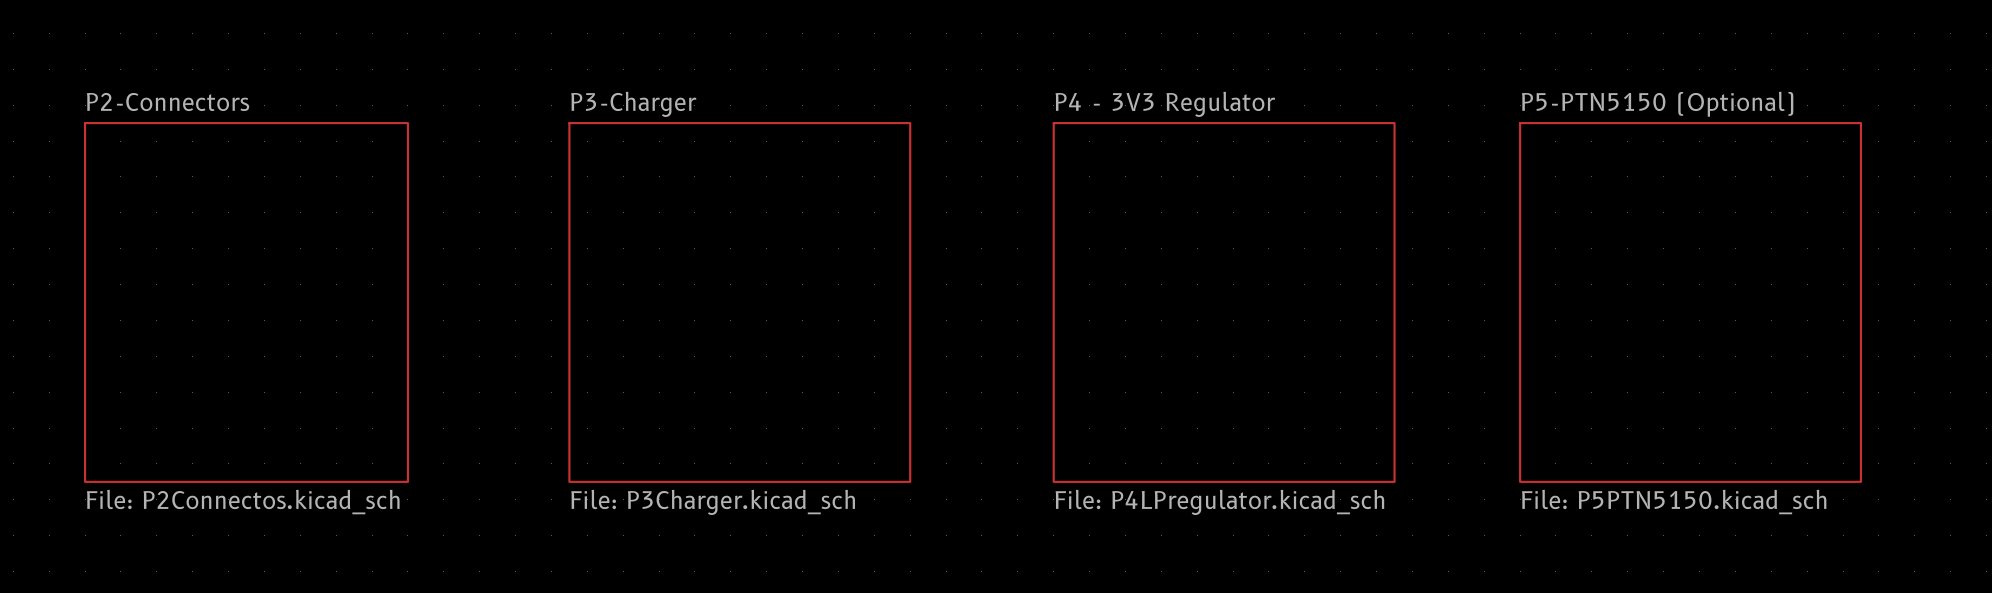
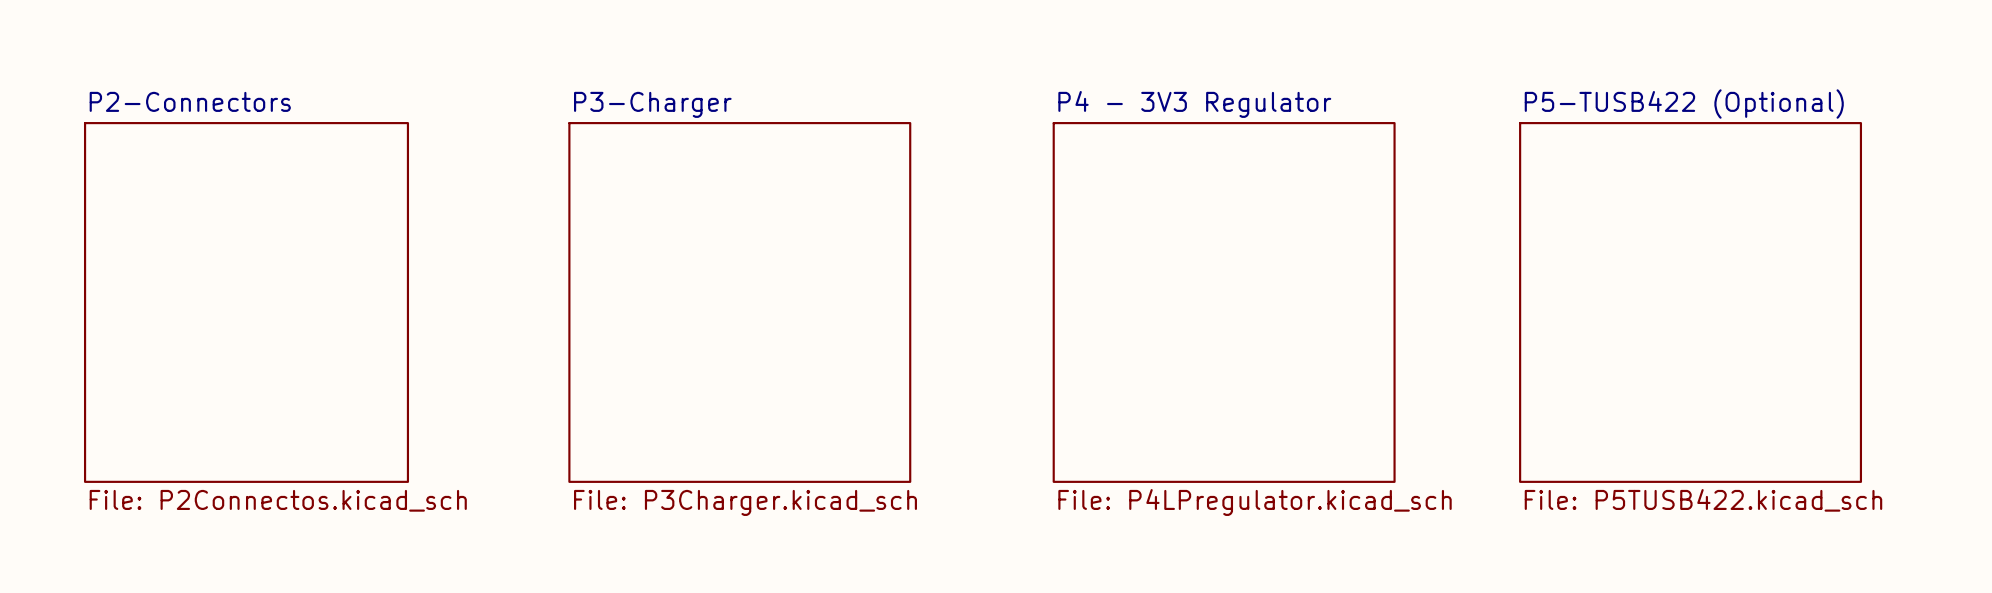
sheet P5-PTN5150 (Optional) name: P5-PTN5150 (Optional) (1657, 104) -> P5-TUSB422 (Optional) (1684, 104)
sheet P5-PTN5150 (Optional) value: File: P5PTN5150.kicad_sch (1674, 502) -> File: P5TUSB422.kicad_sch (1703, 500)

